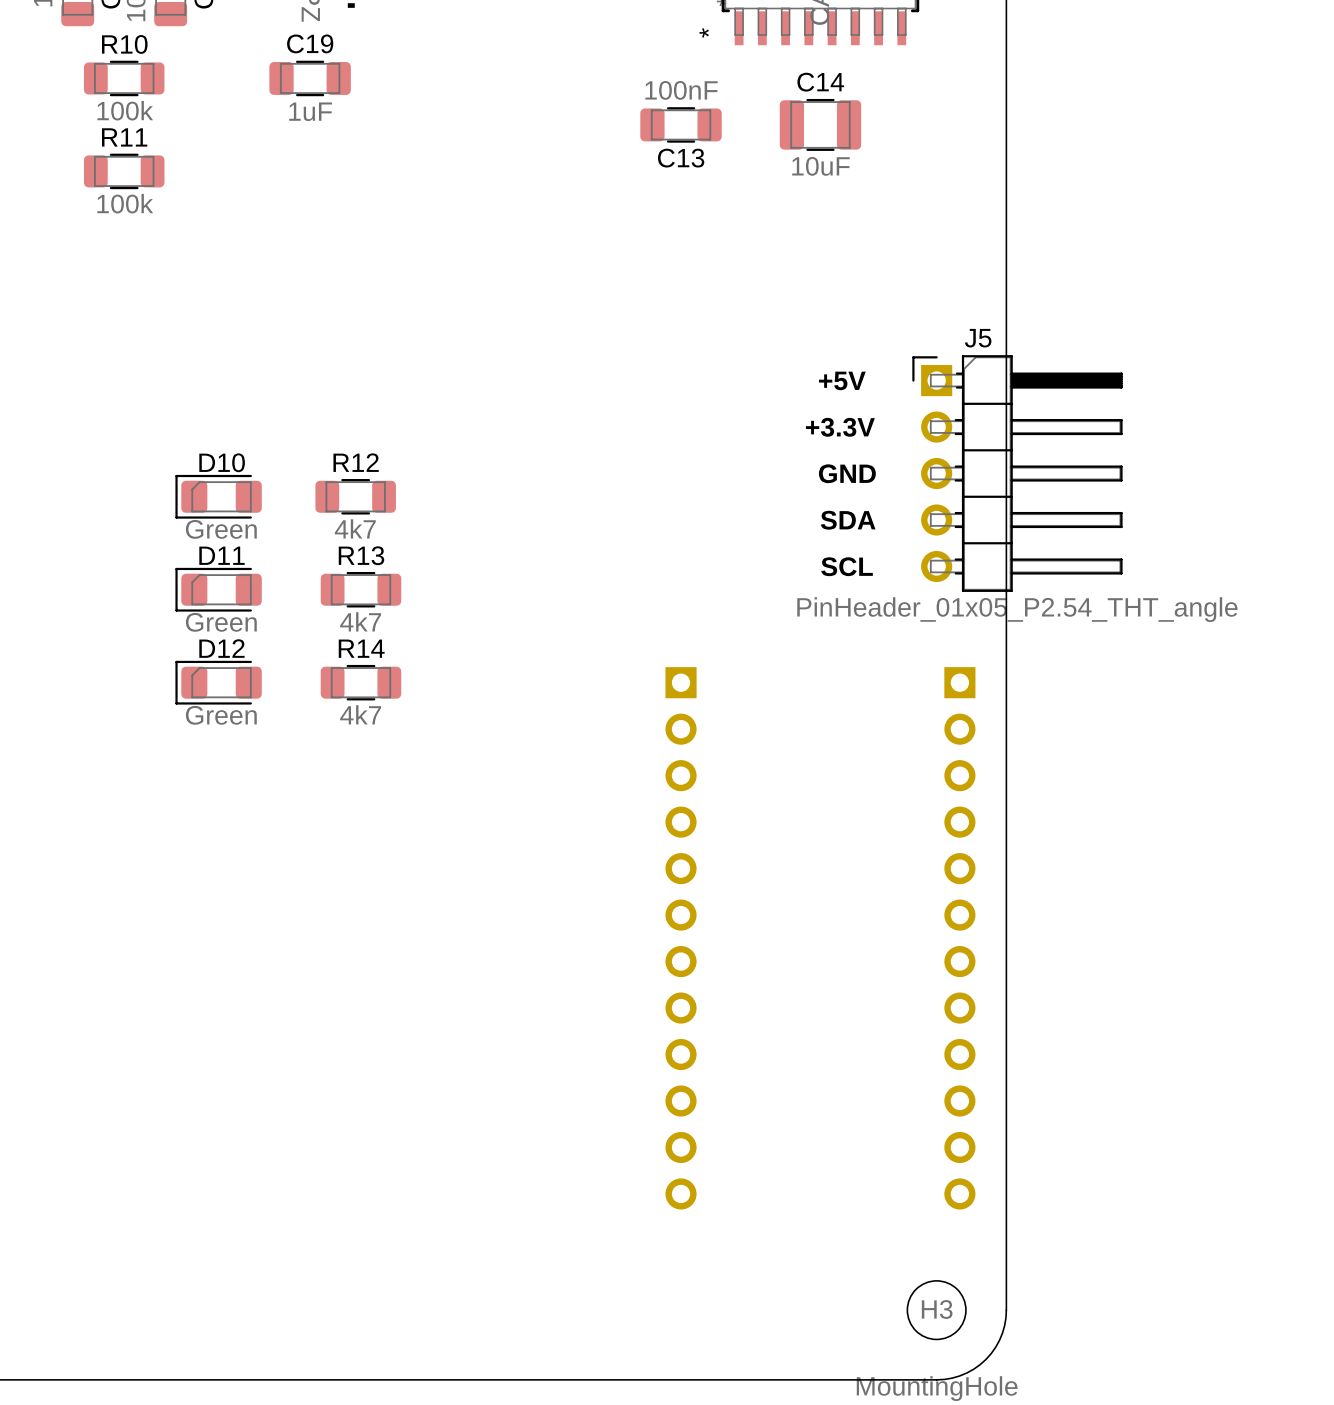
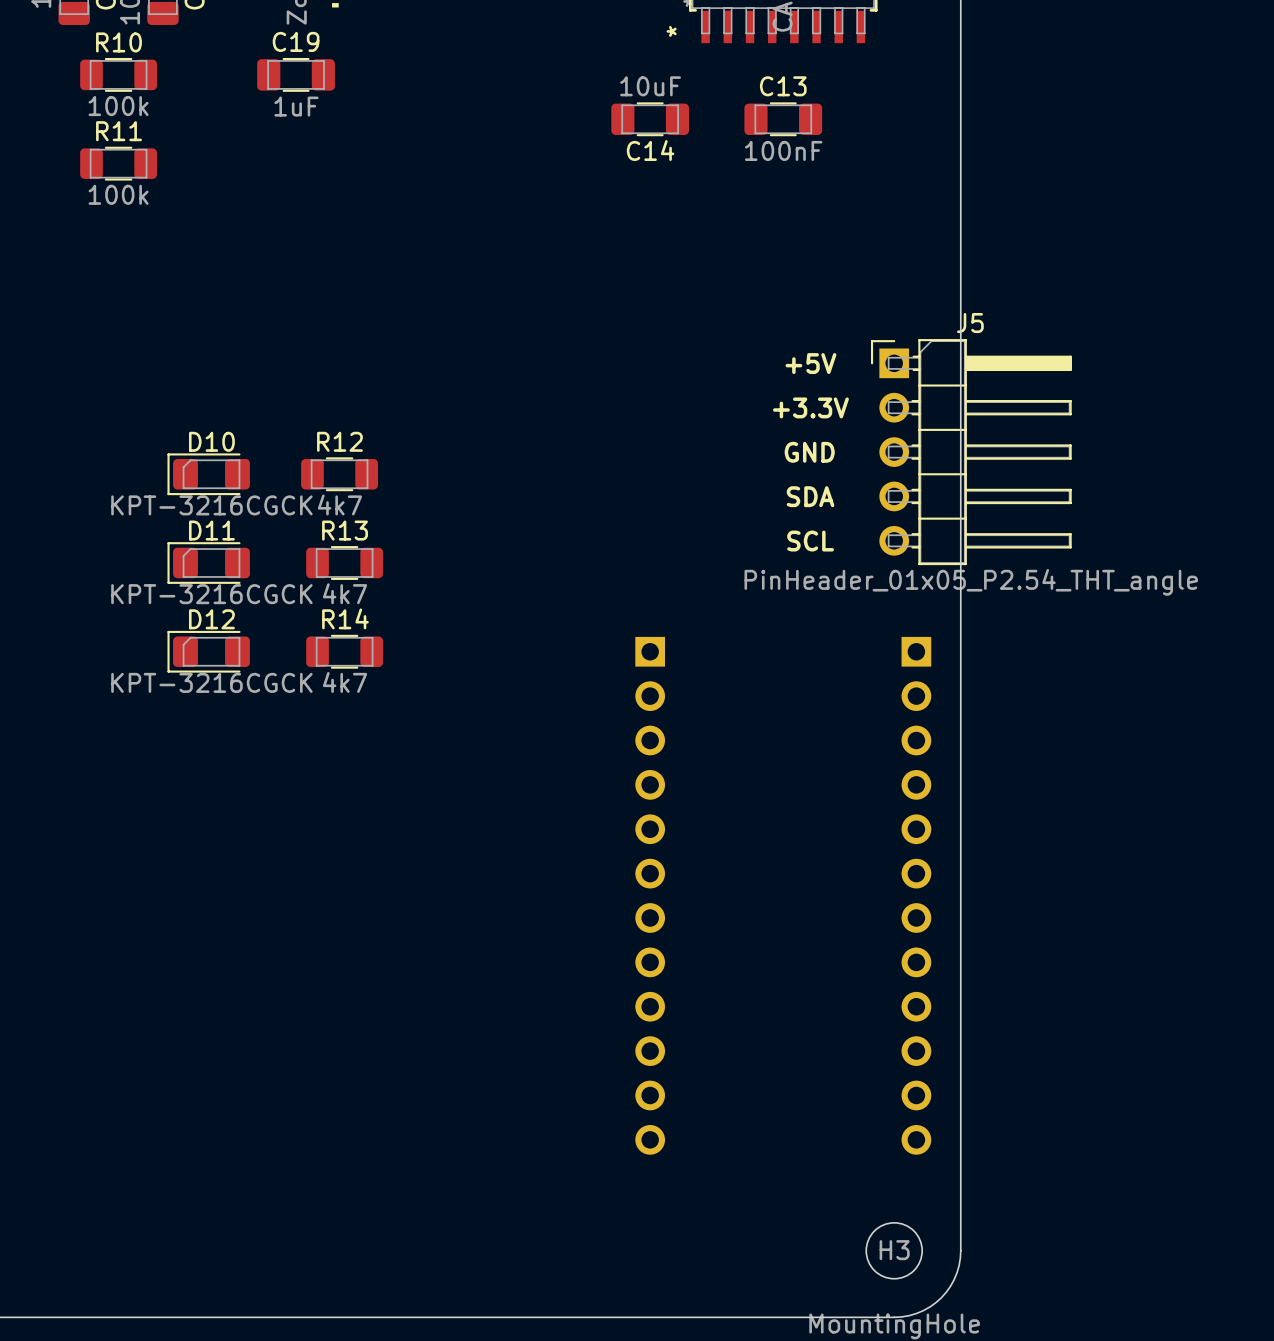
C13 value: 100nF (681, 90) -> 10uF (650, 86)
C14: 10uF (820, 124) -> none
C13: none -> 100nF (783, 119)
C13 name: C13 (681, 158) -> C14 (650, 150)
J5 name position: J5 (978, 338) -> J5 (970, 323)
D10 value: Green (221, 529) -> KPT-3216CGCK (211, 505)
D11 value: Green (221, 622) -> KPT-3216CGCK (211, 594)
D12 value: Green (221, 715) -> KPT-3216CGCK (211, 682)

